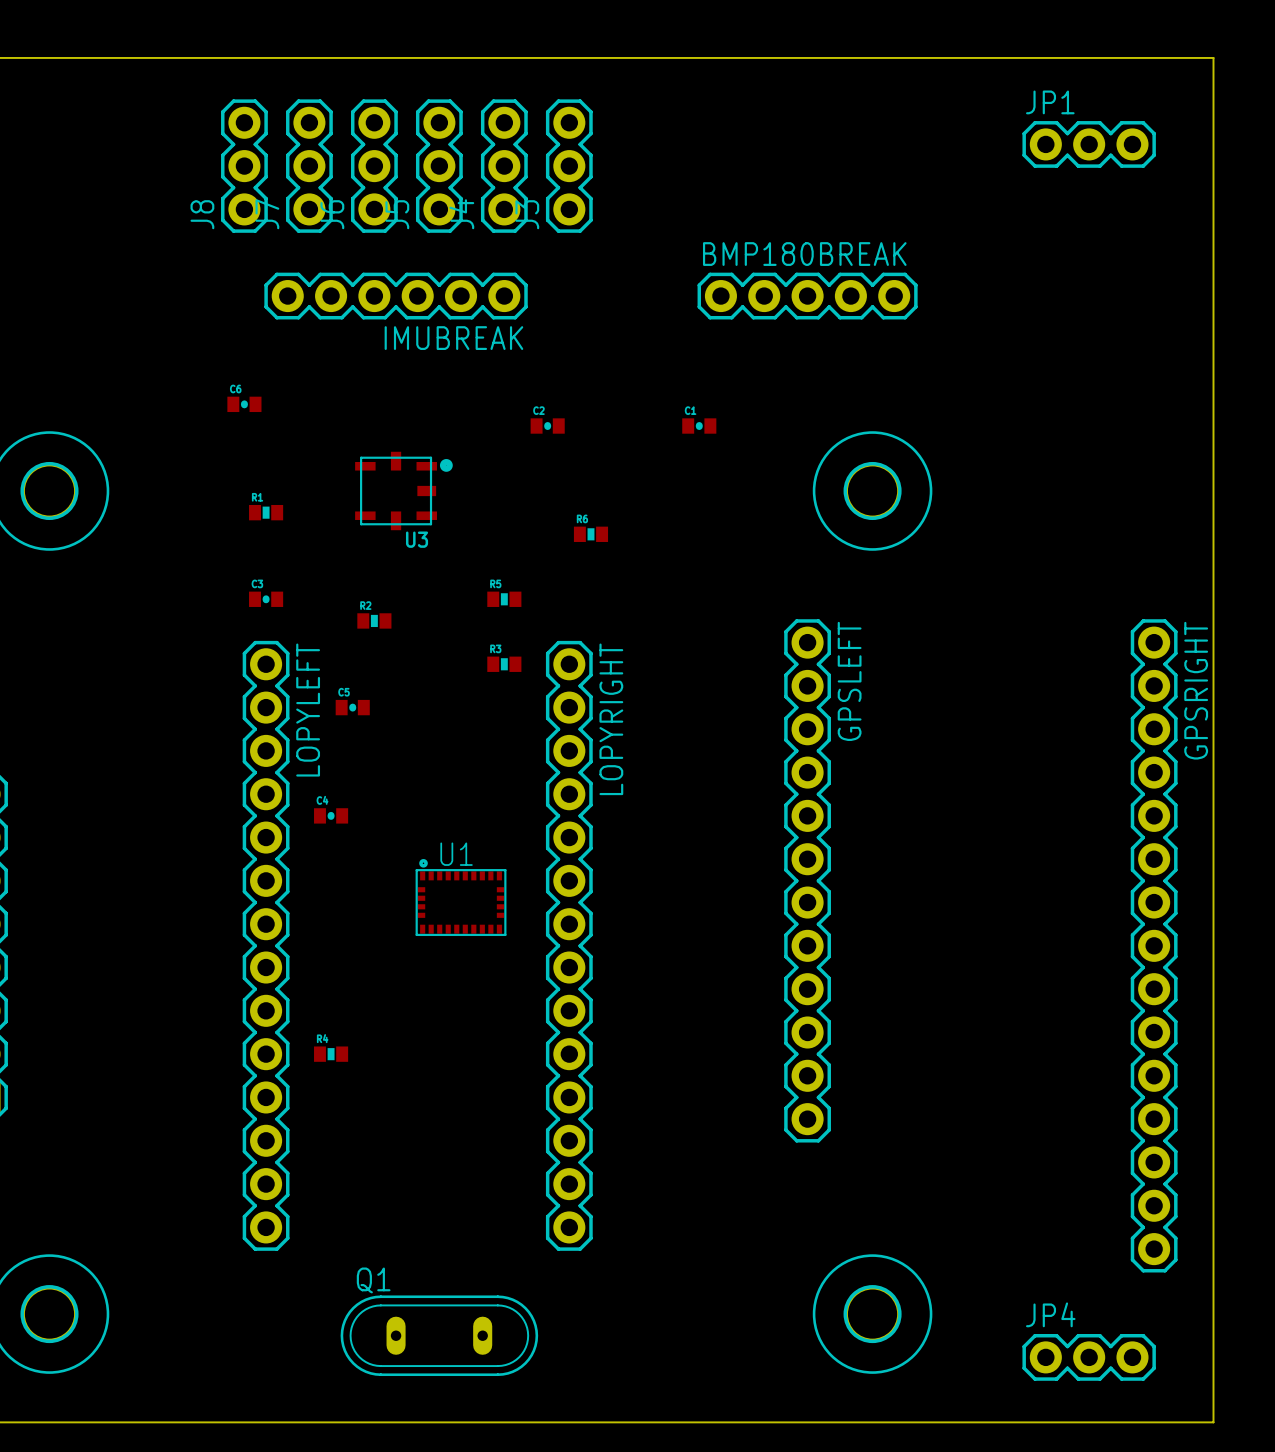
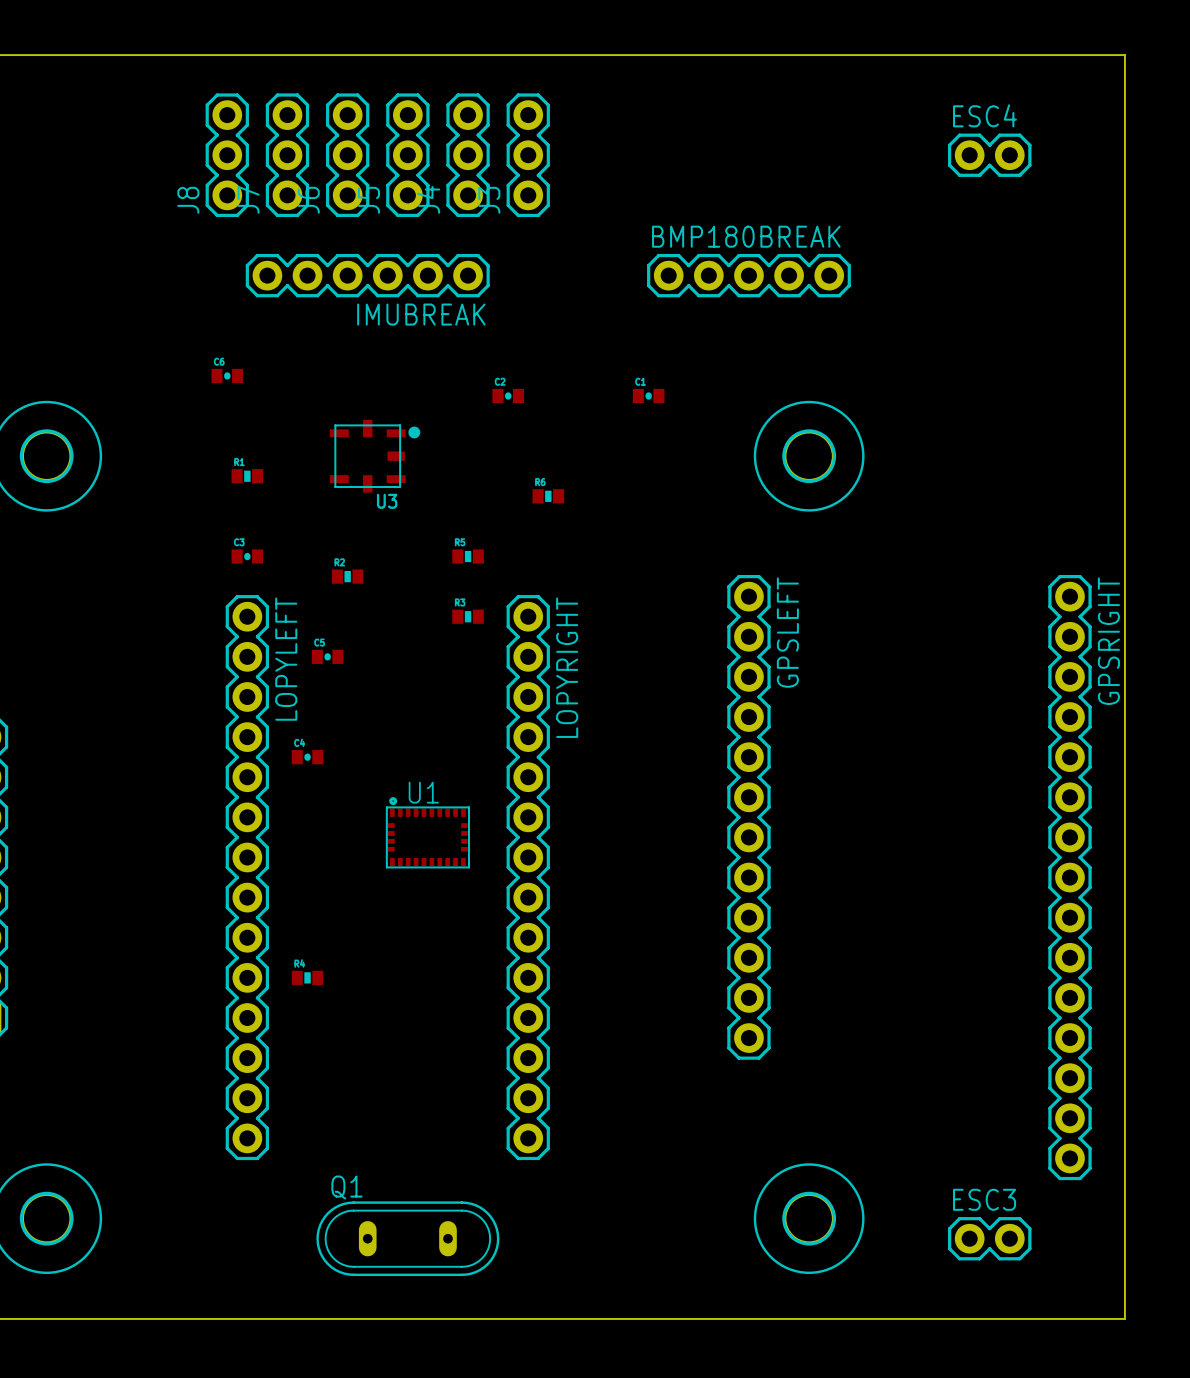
JP1: (1089, 144) -> none
ESC4: none -> (989, 155)
ESC3: none -> (989, 1238)
JP4: (1089, 1357) -> none

